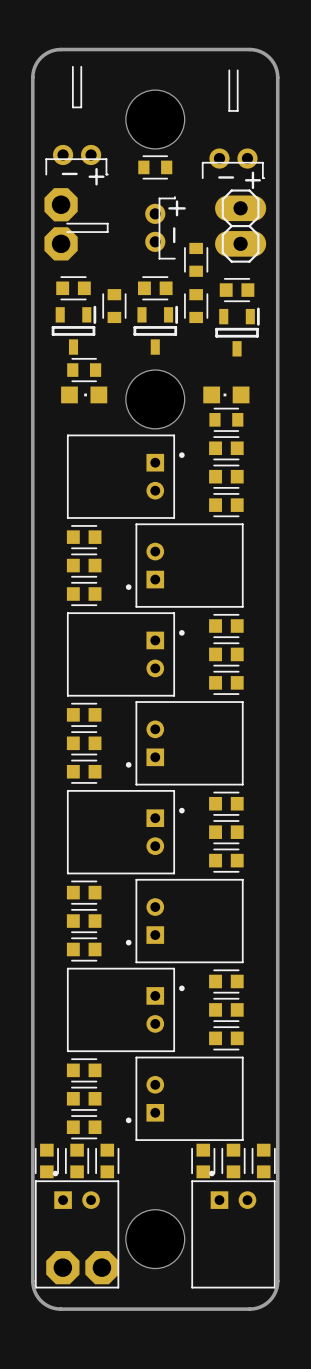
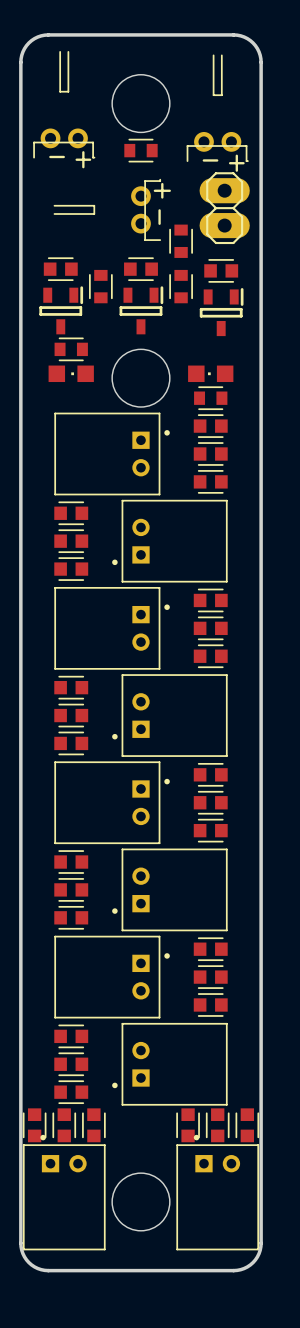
part: (61, 204) -> none
part: (61, 243) -> none
part: (62, 1267) -> none
part: (101, 1267) -> none

